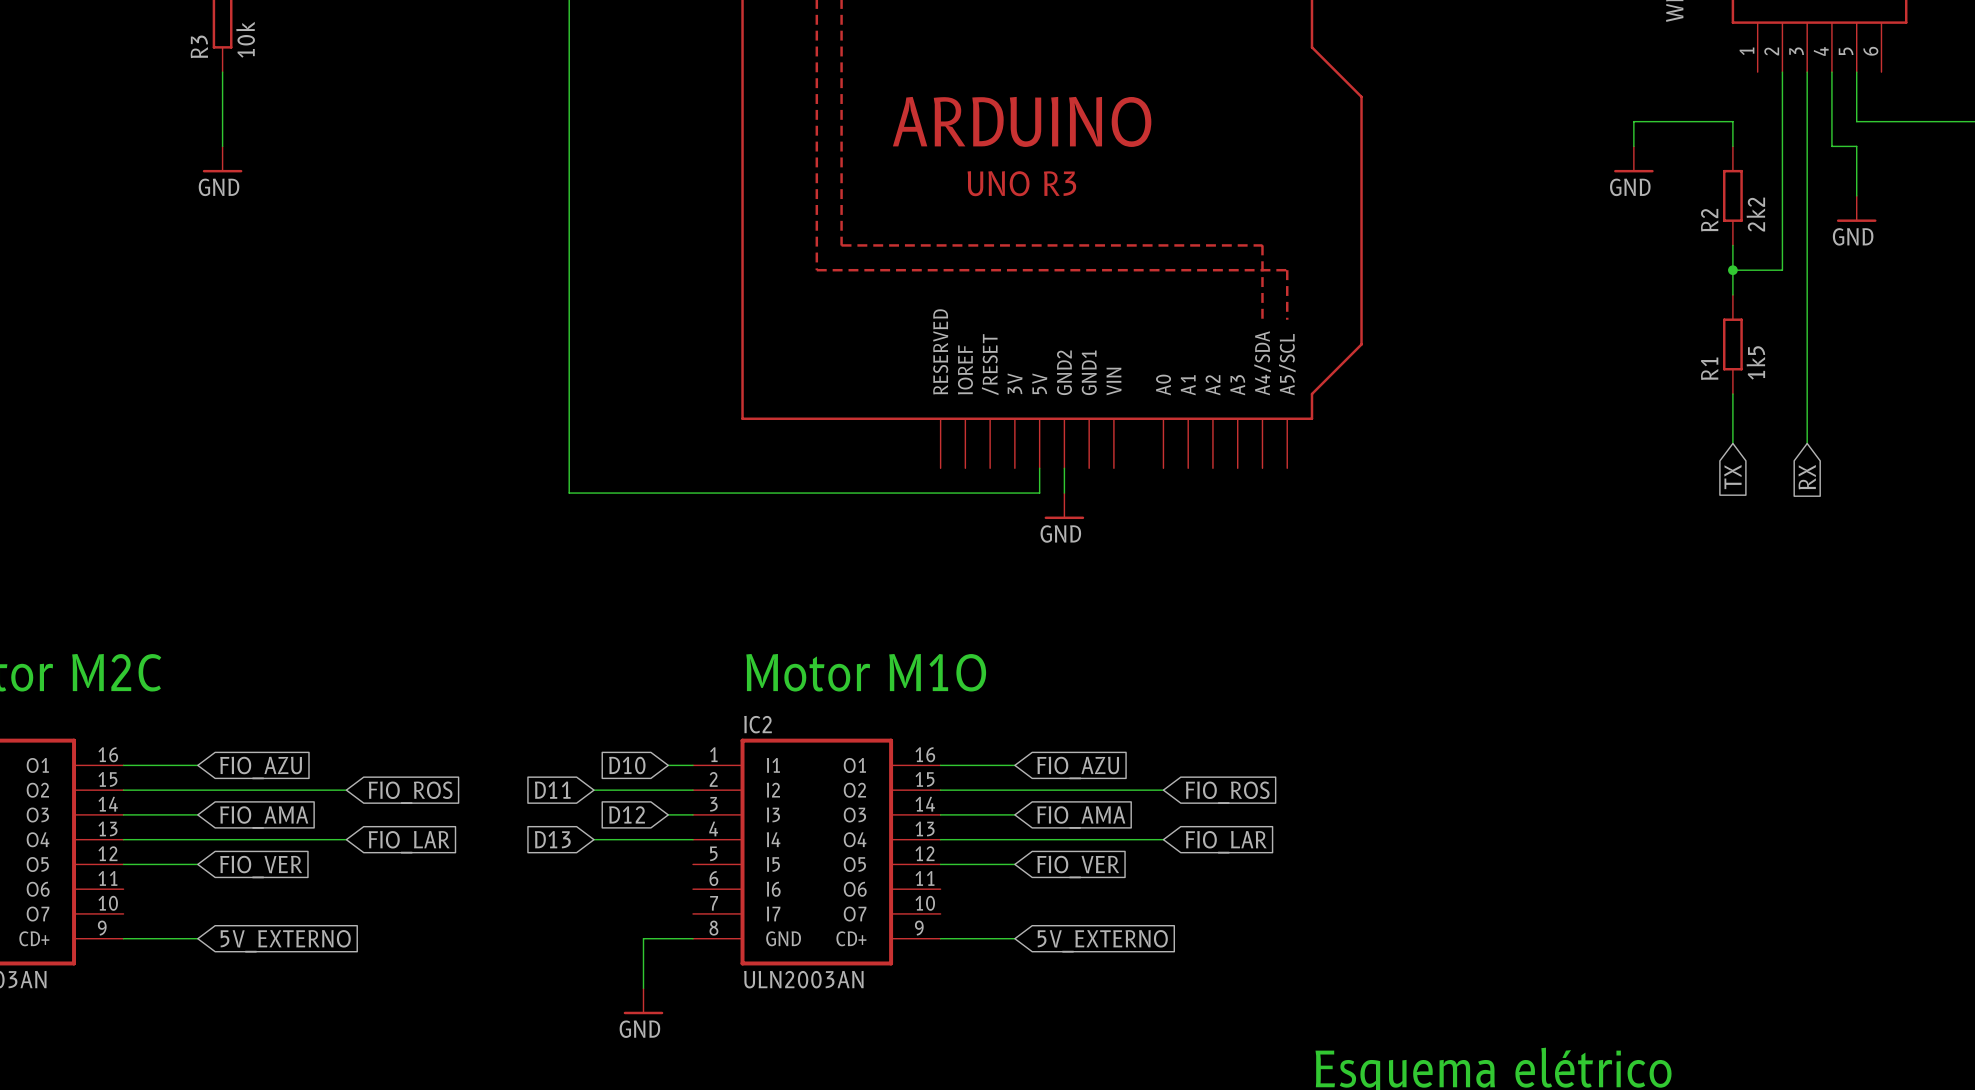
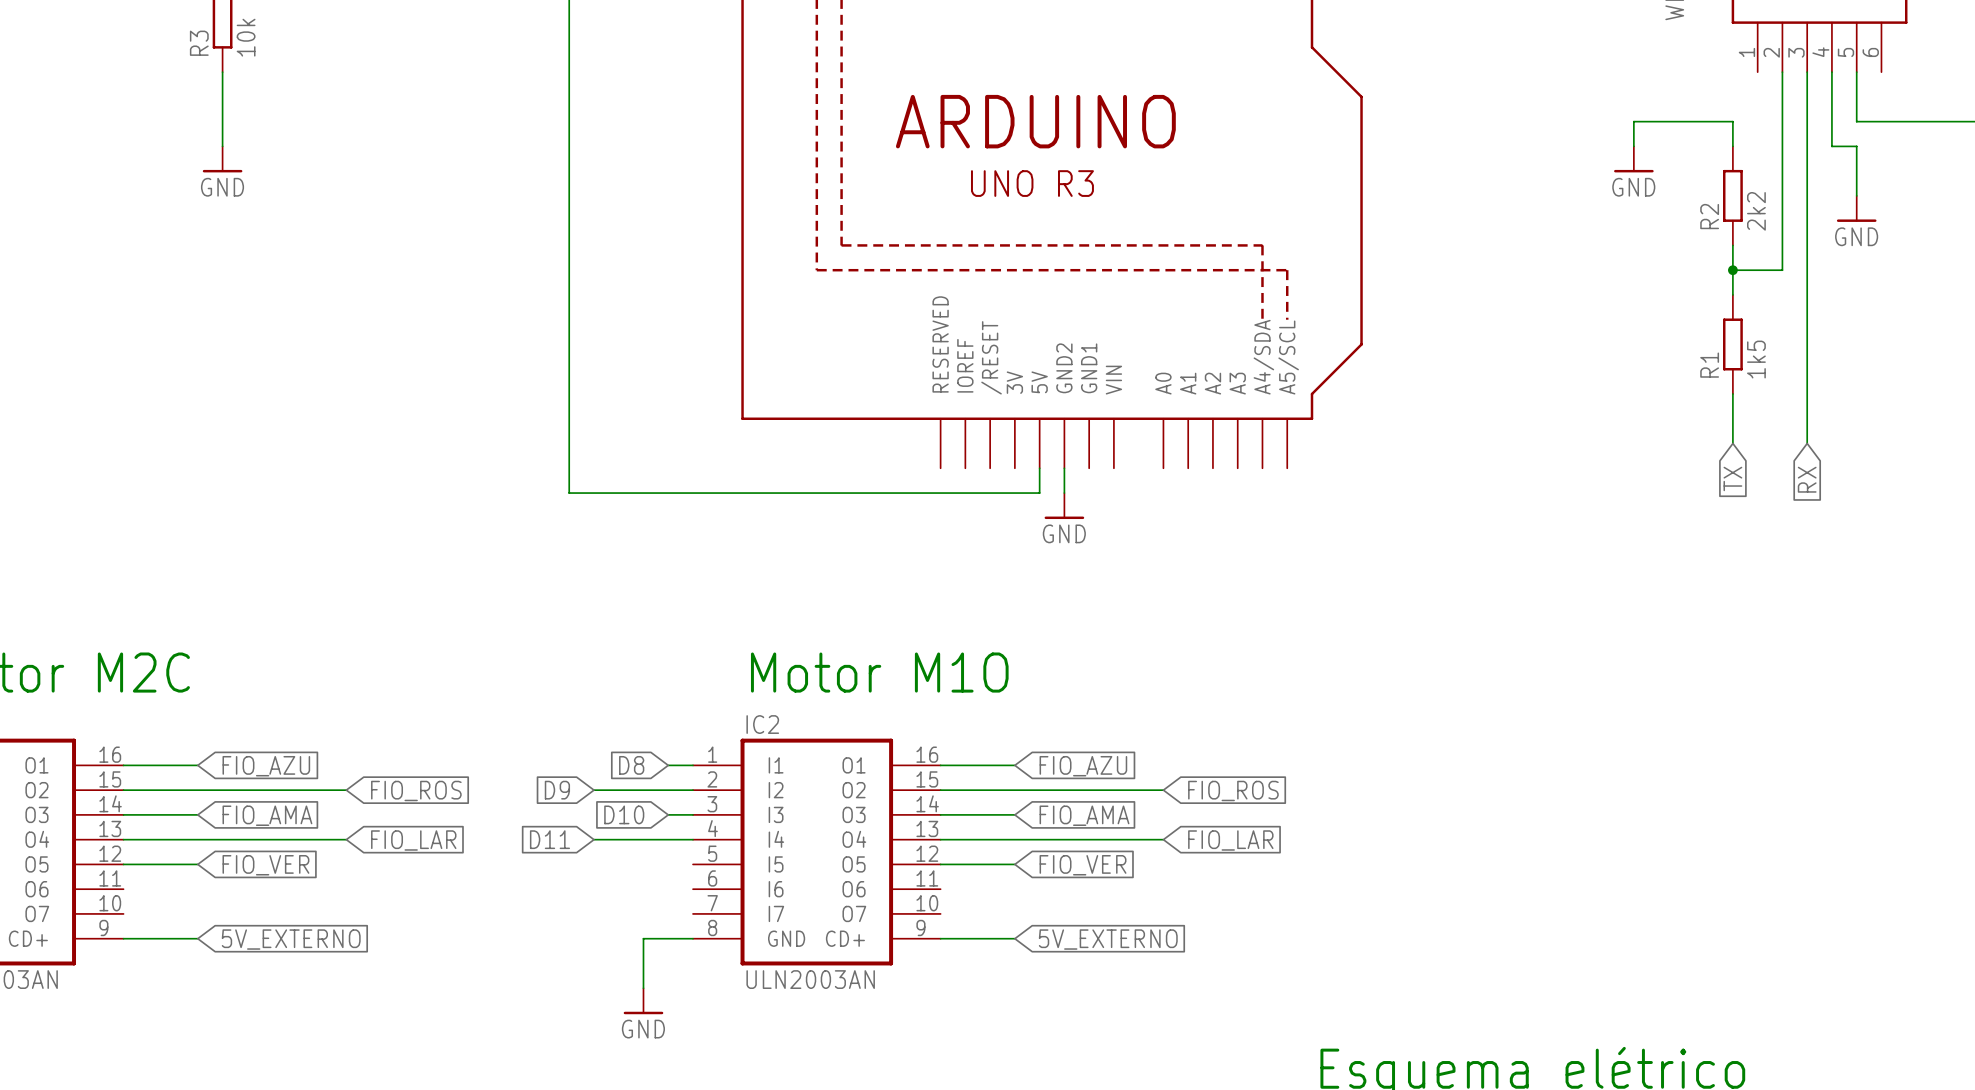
global label: D10 (627, 765) -> D8 (631, 765)
global label: D11 (552, 790) -> D9 (557, 790)
global label: D12 (627, 814) -> D10 (624, 814)
global label: D13 (552, 839) -> D11 (549, 839)

